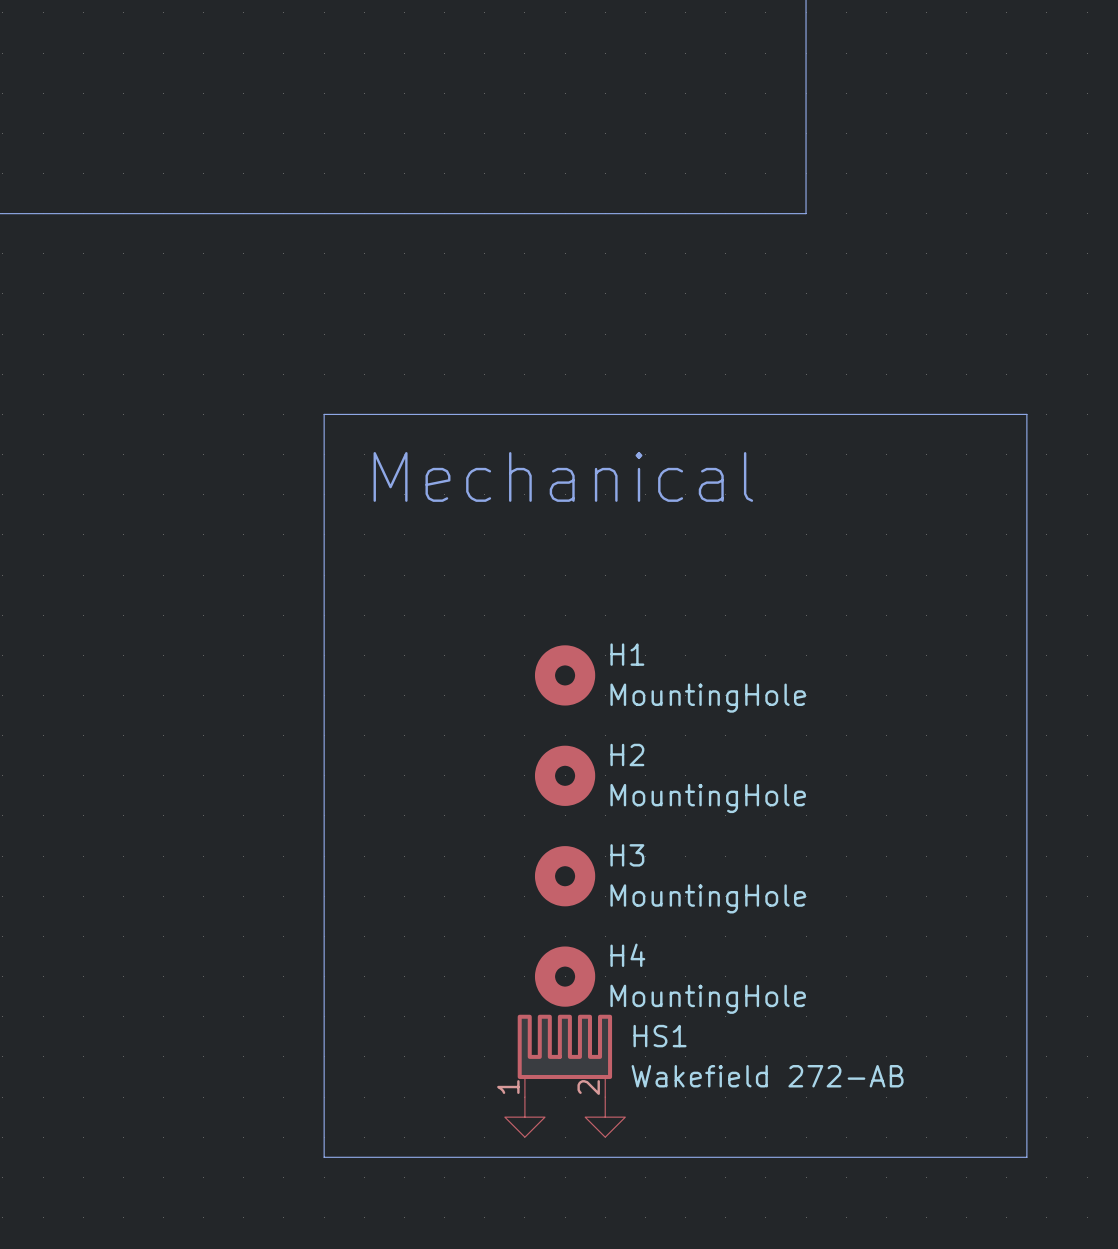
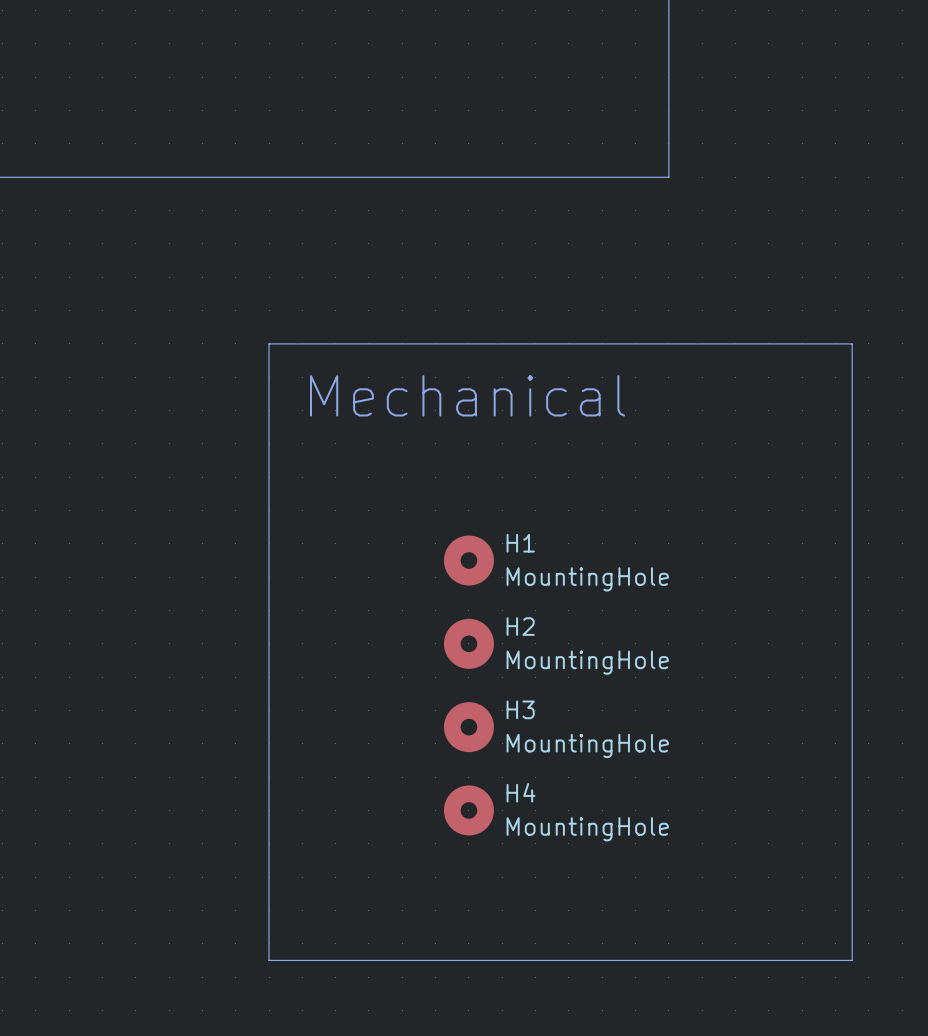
HS1: Wakefield 272-AB (564, 1055) -> none
power symbol: (524, 1117) -> none
power symbol: (605, 1117) -> none

